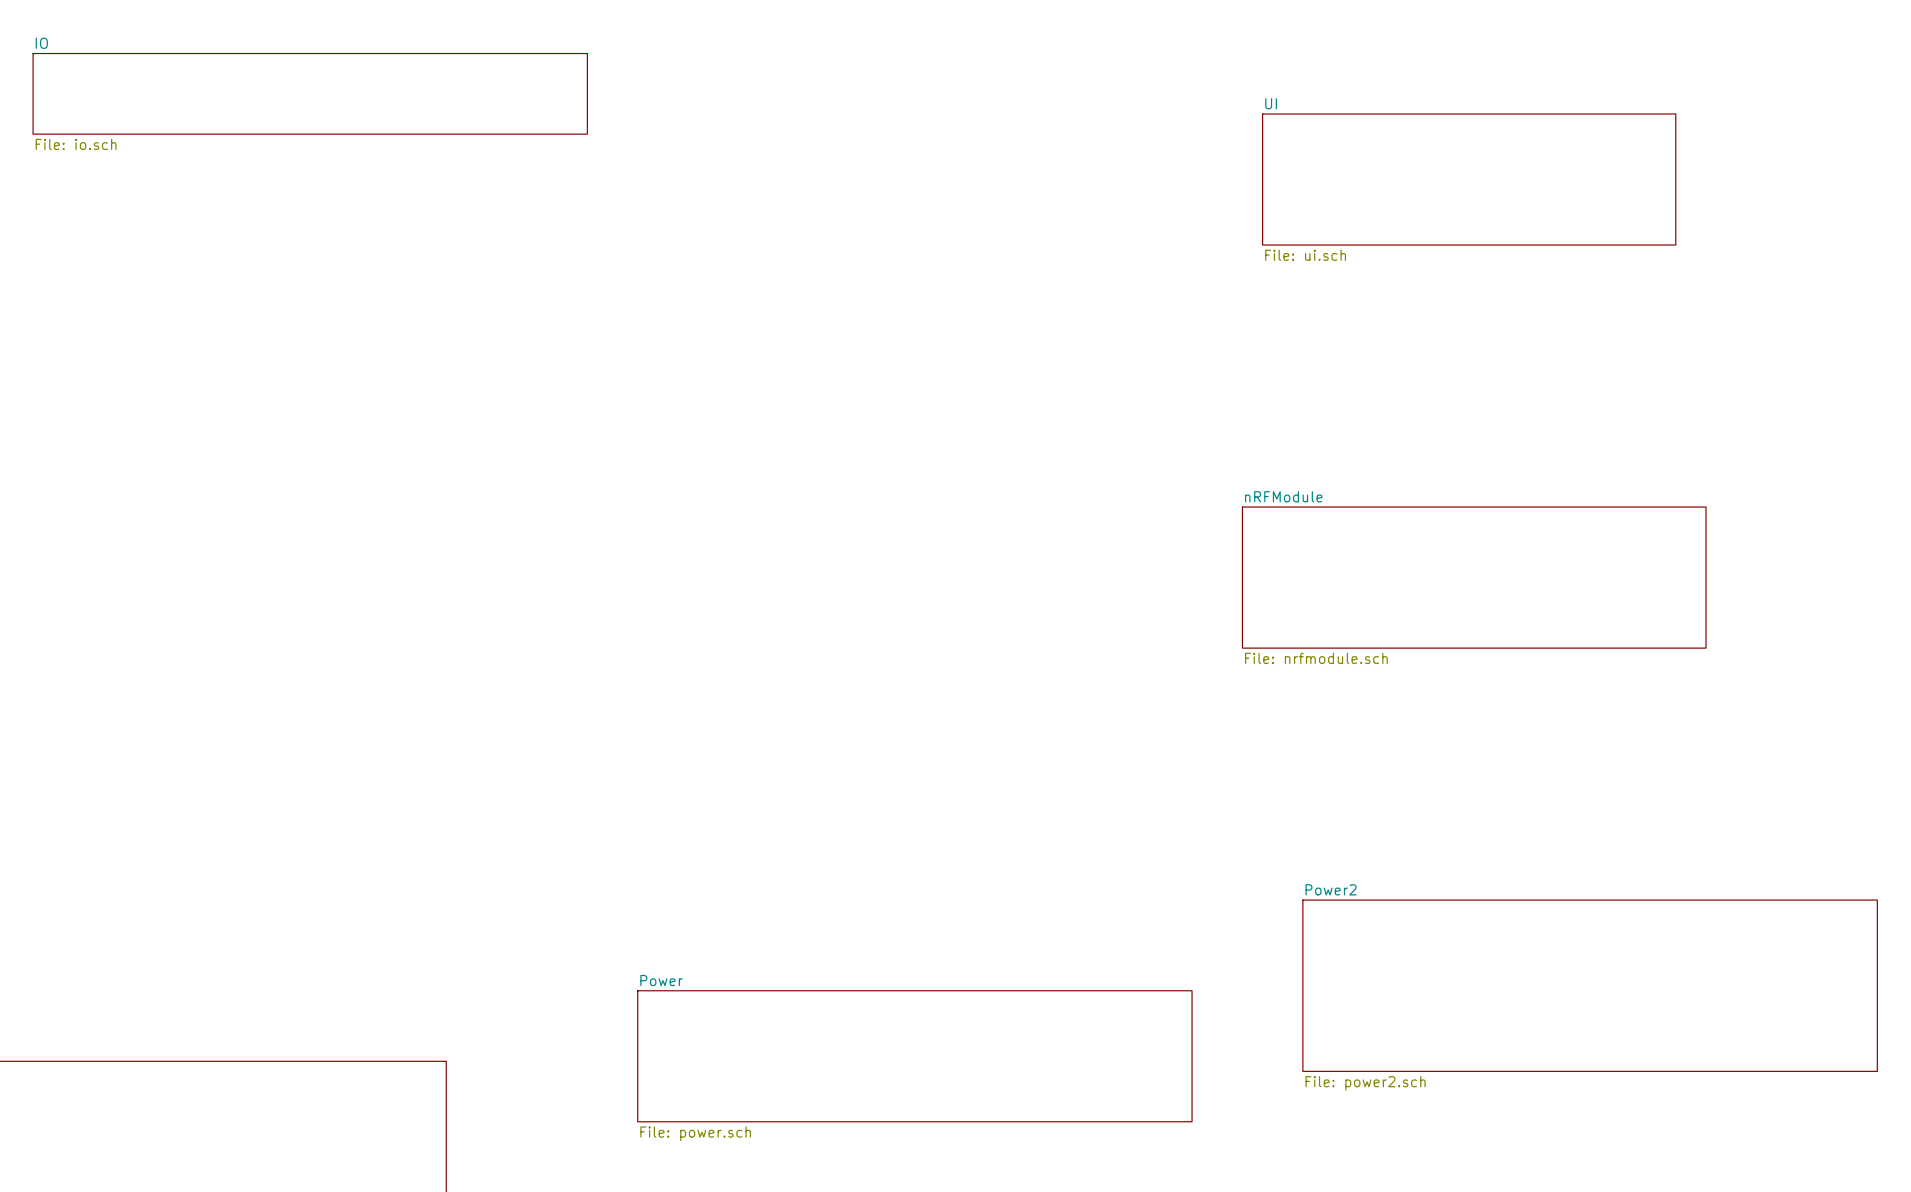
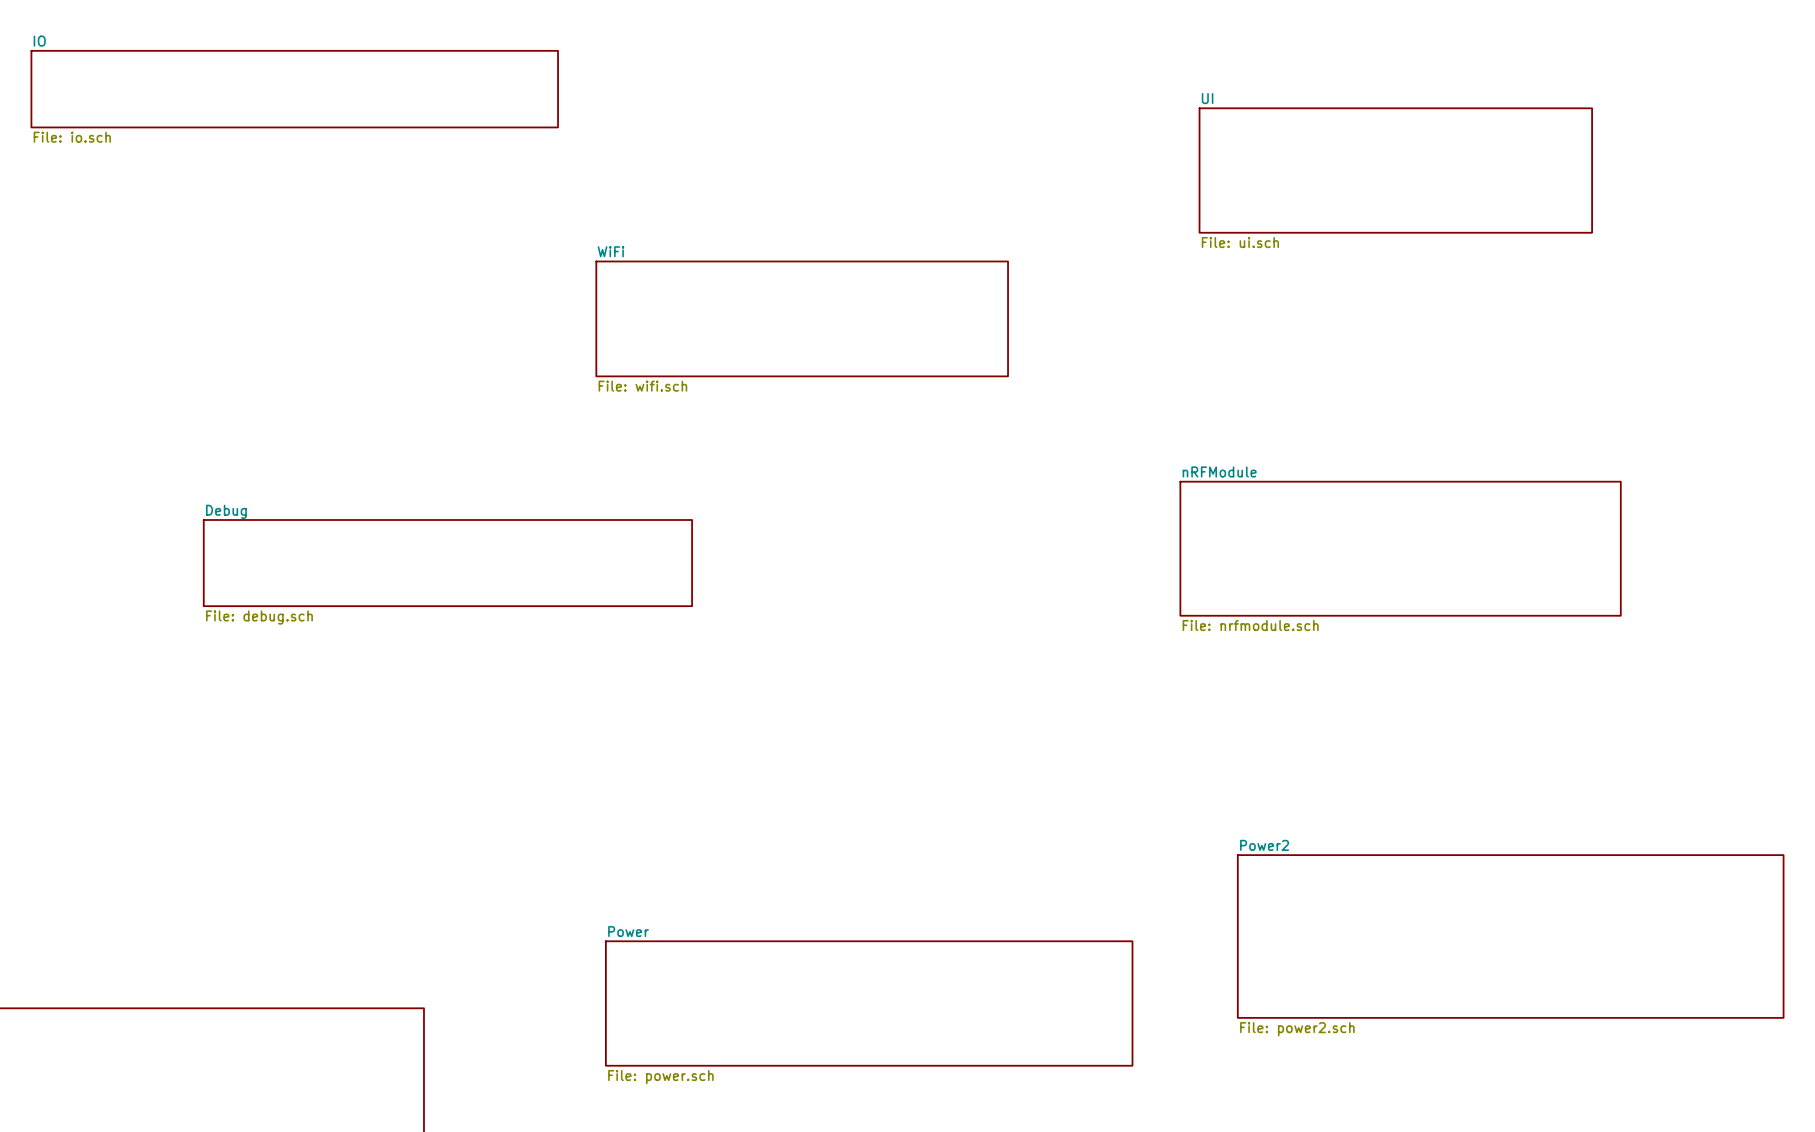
sheet WiFi: none -> File: wifi.sch (802, 318)
sheet Debug: none -> File: debug.sch (447, 563)

